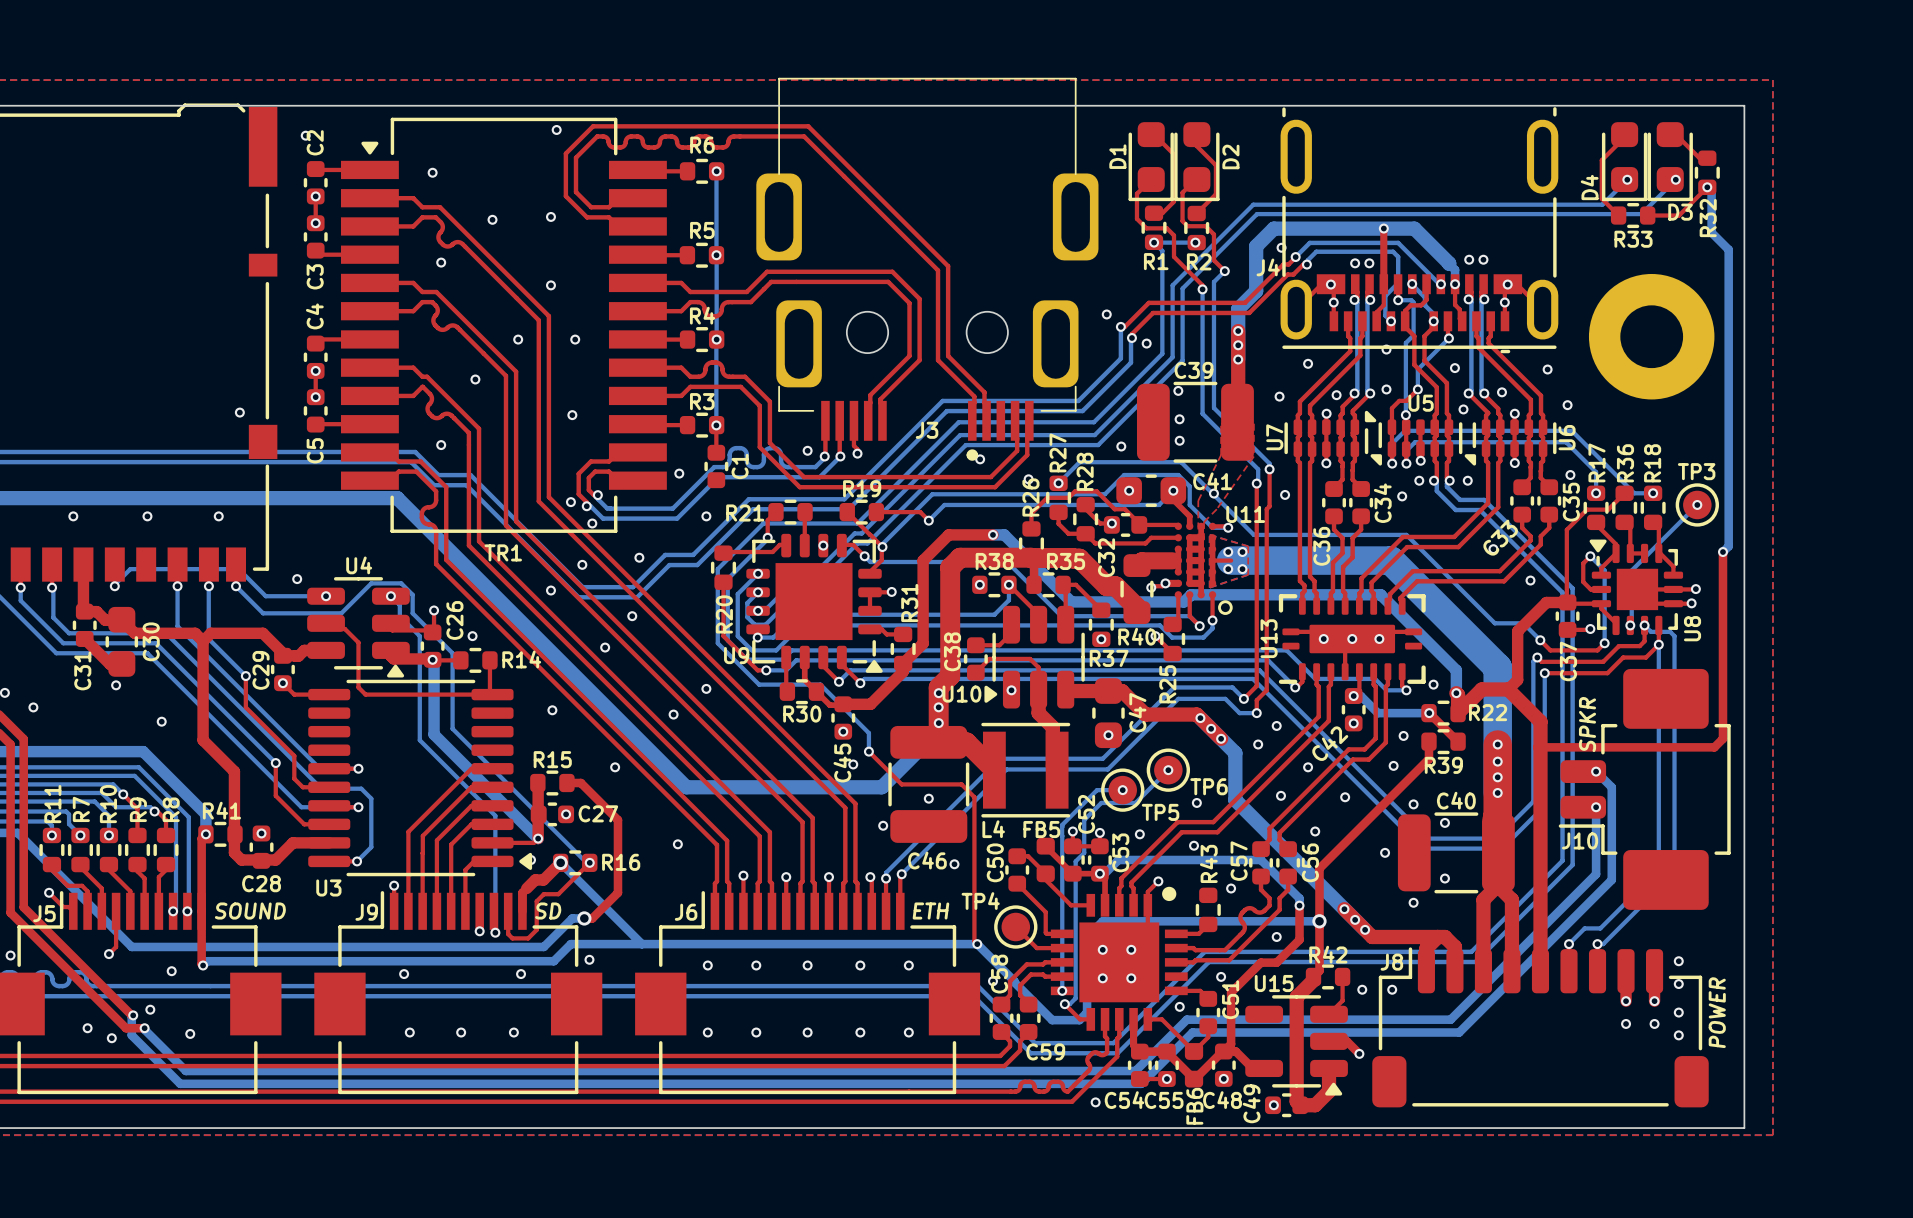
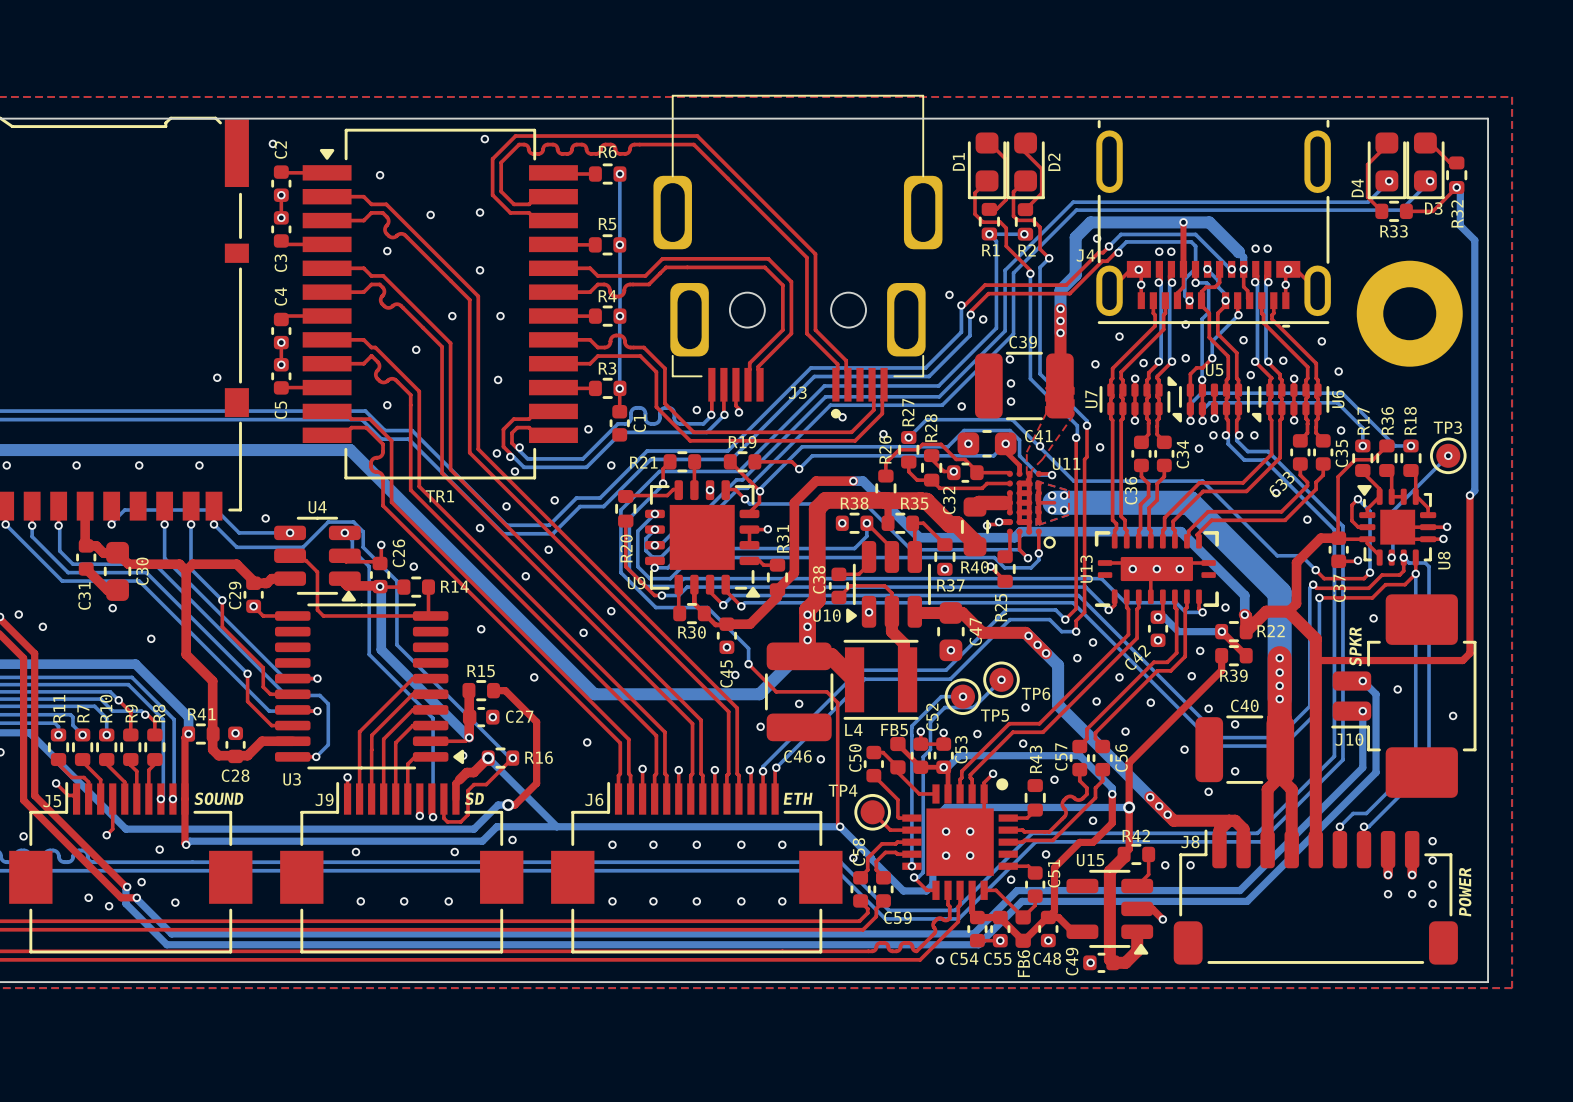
via: none -> (1373, 618)
via: none -> (1397, 689)
via: none -> (1453, 715)

